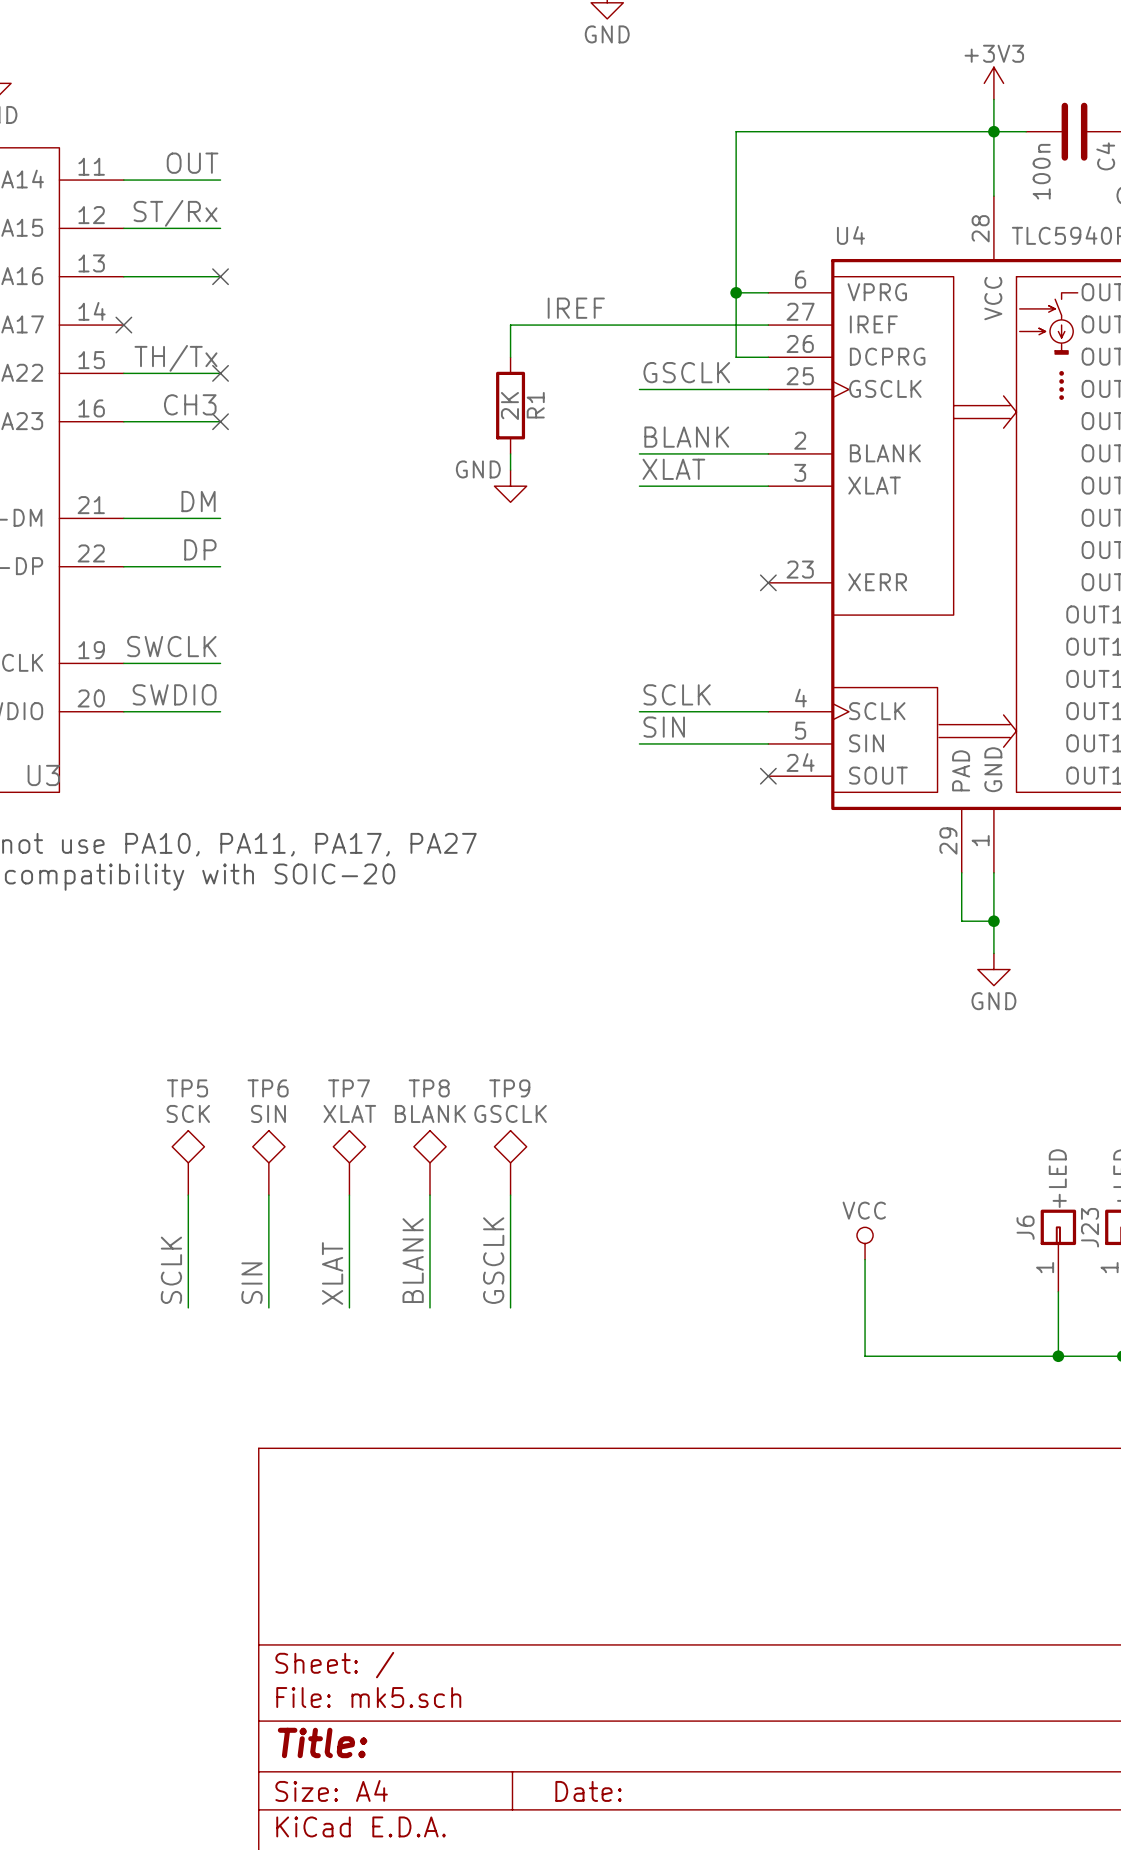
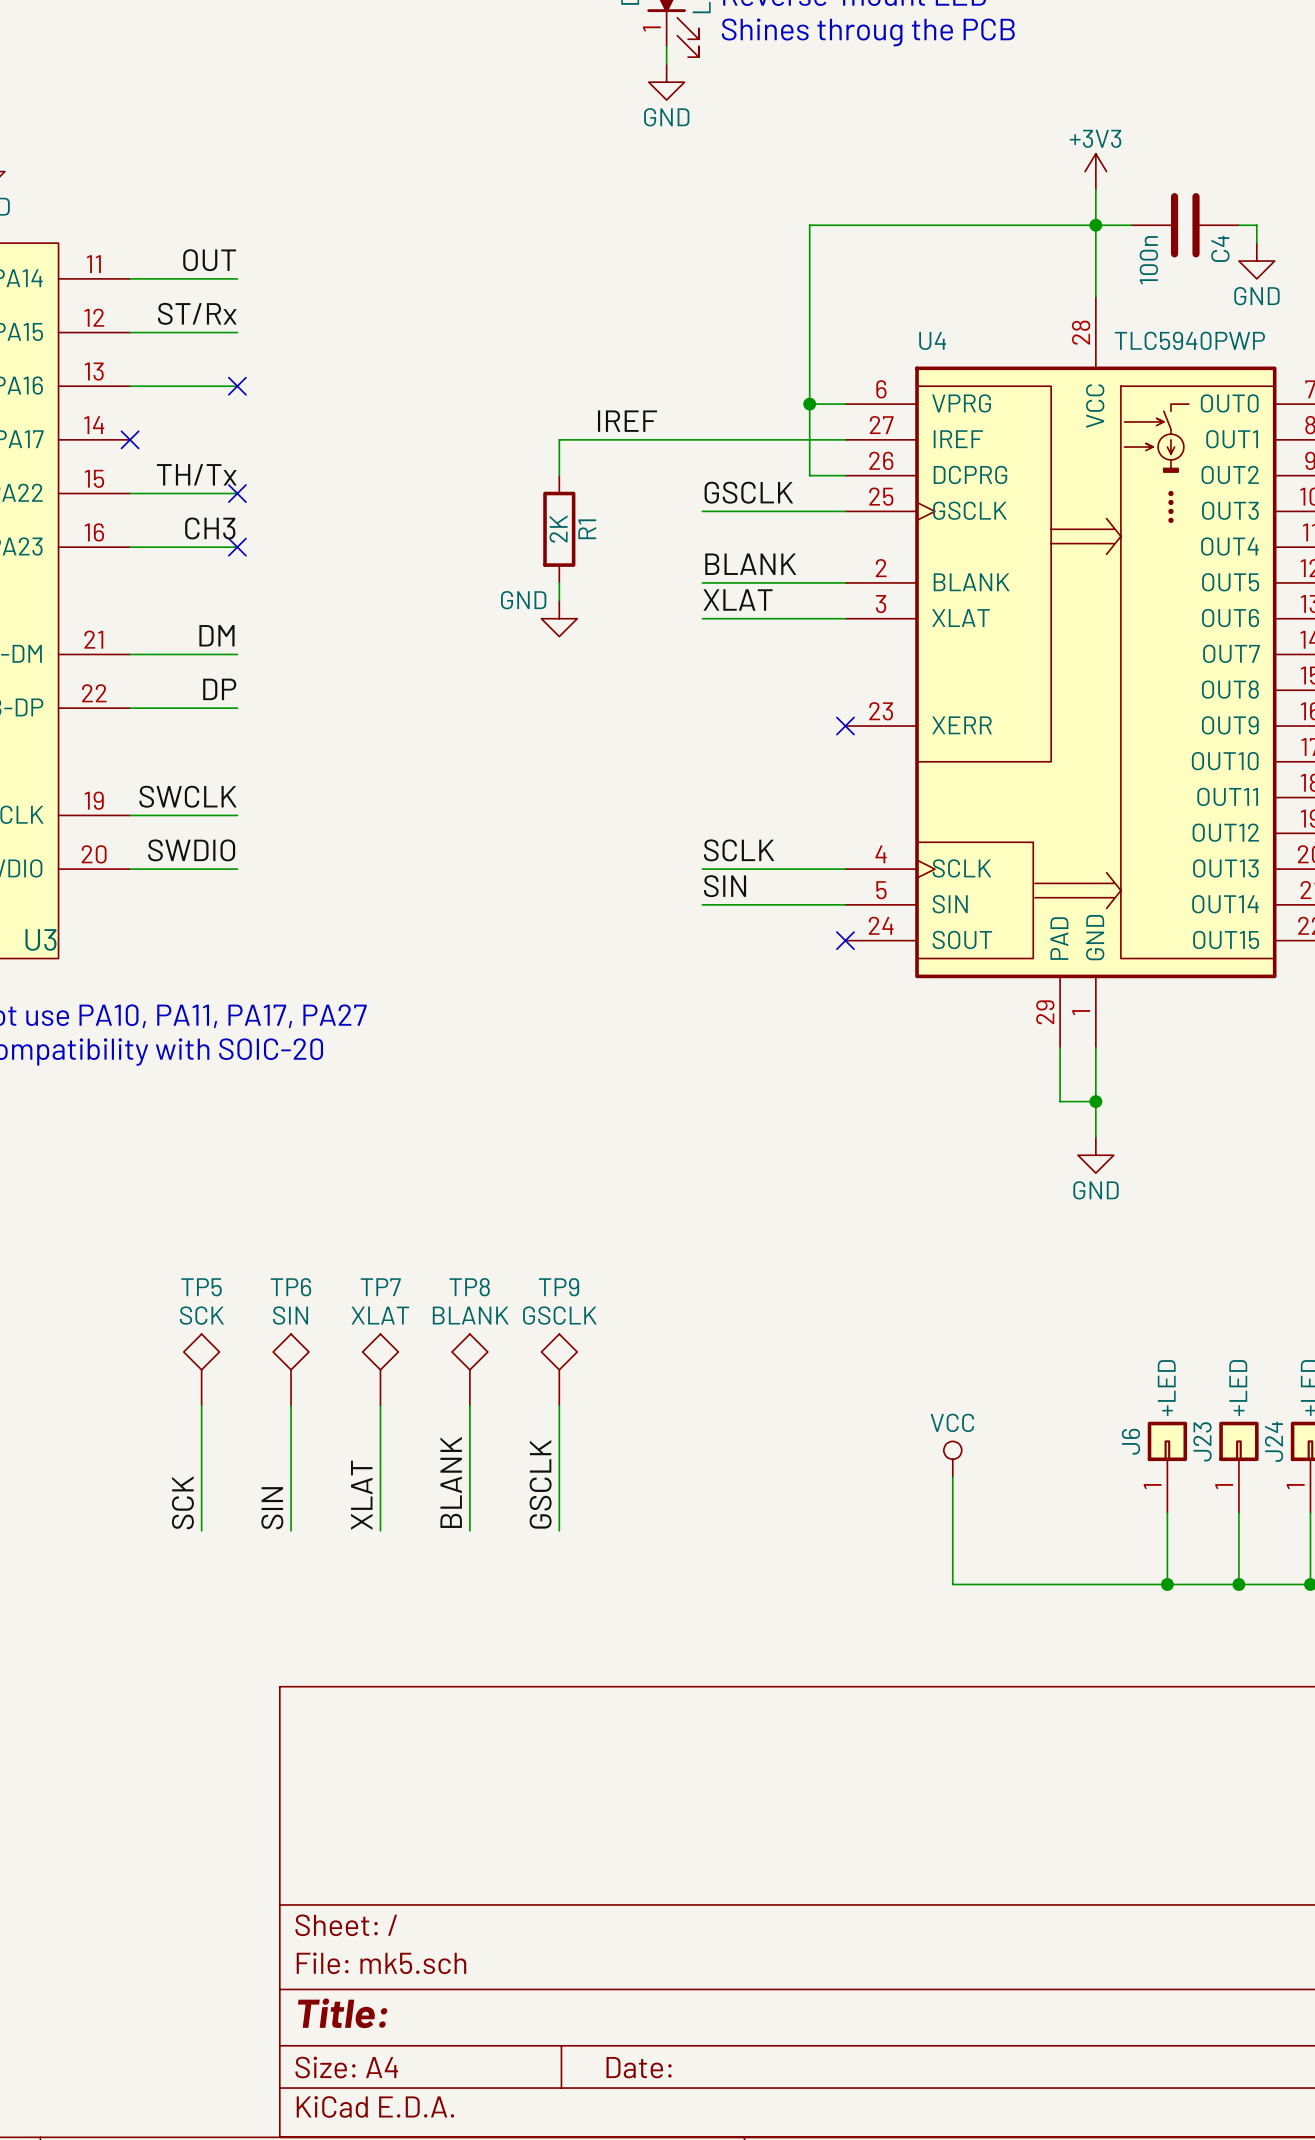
label: SCLK (171, 1270) -> SCK (182, 1502)

